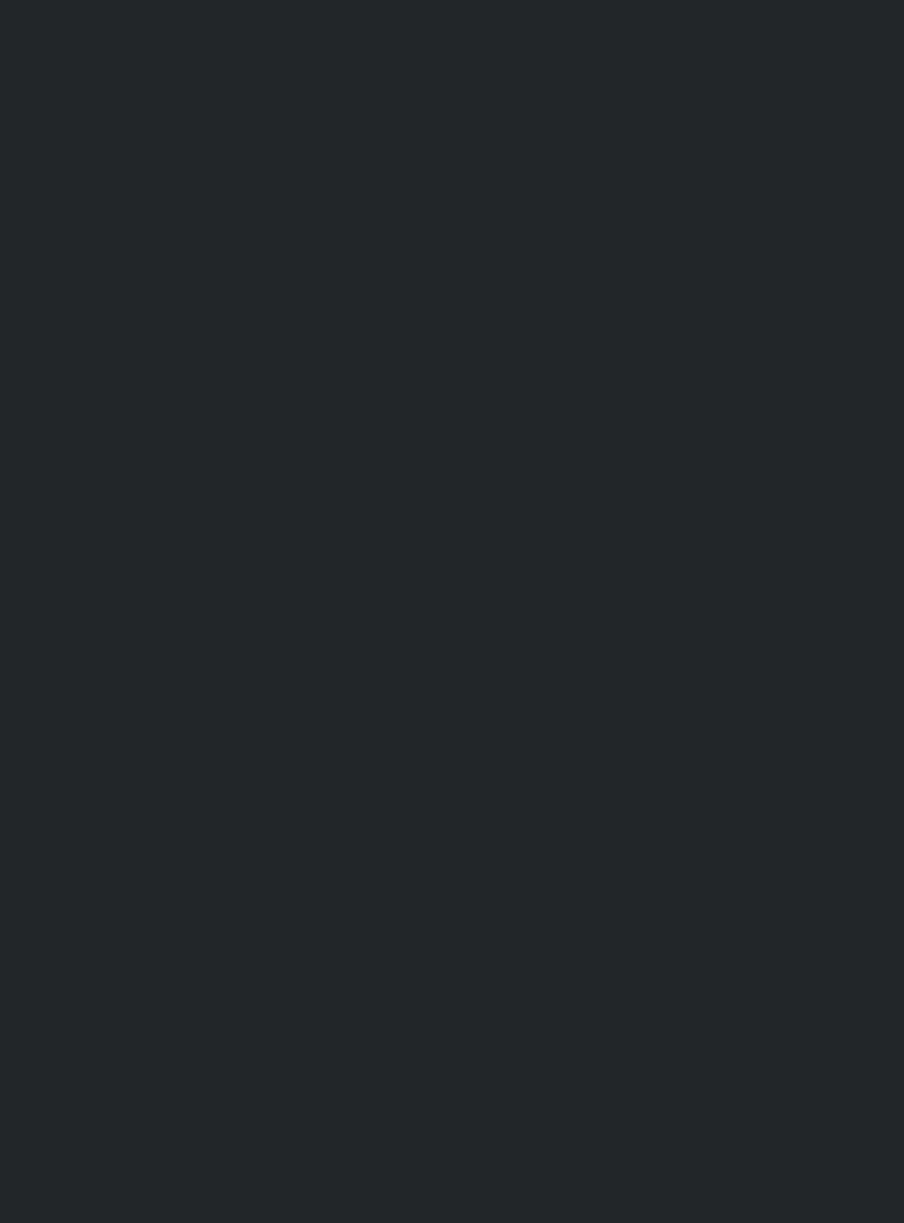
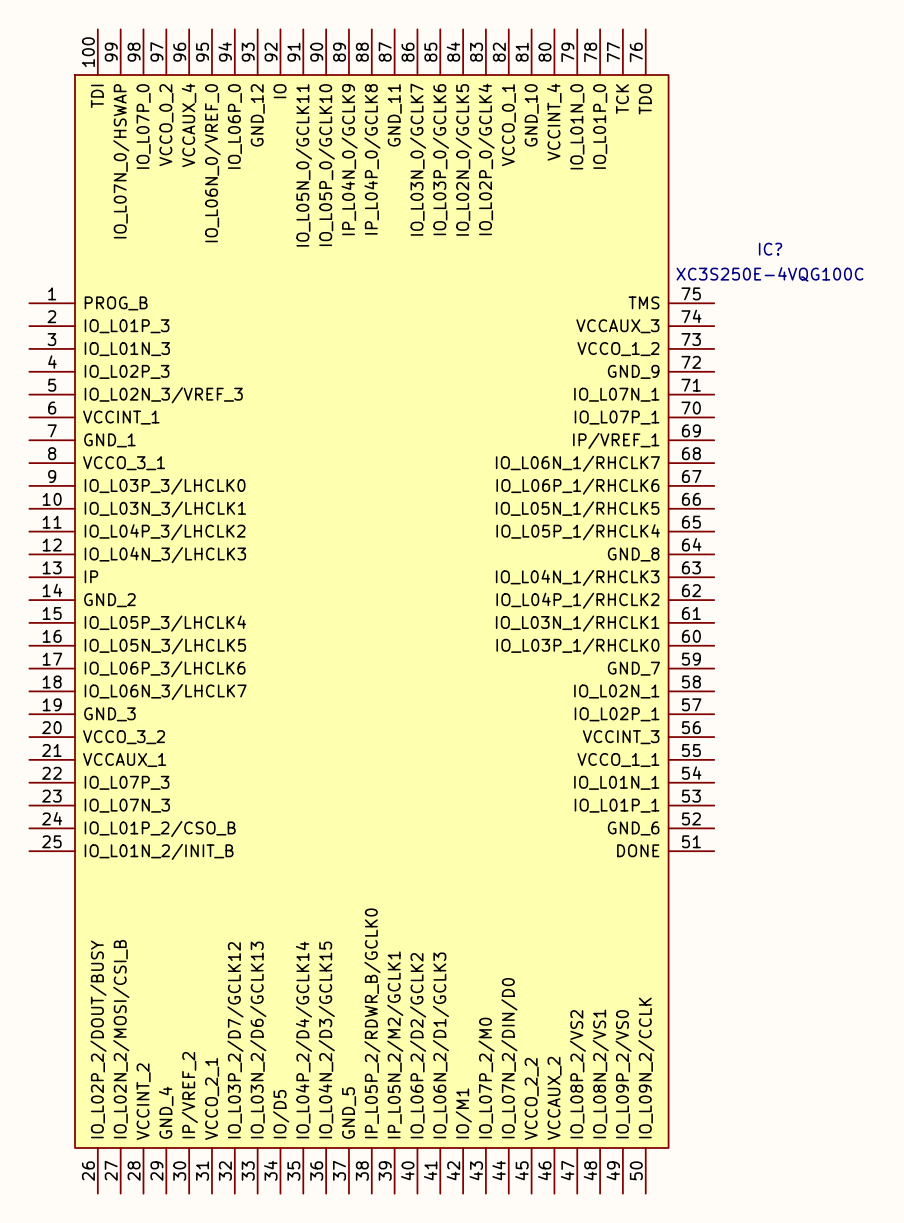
IC?: none -> XC3S250E-4VQG100C (371, 611)

